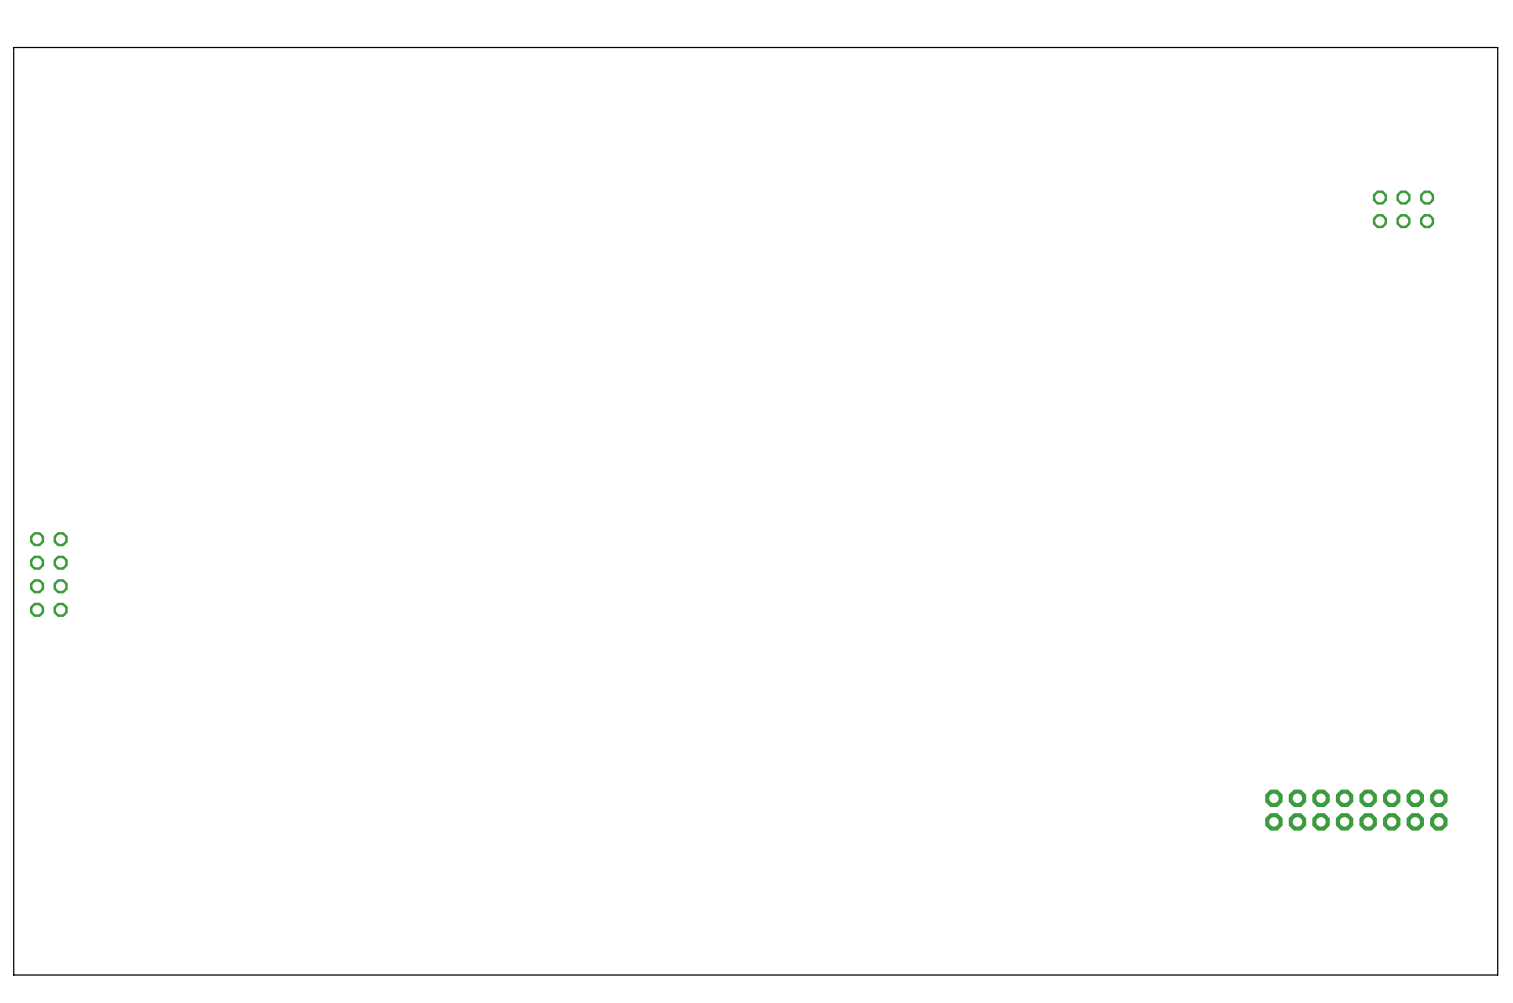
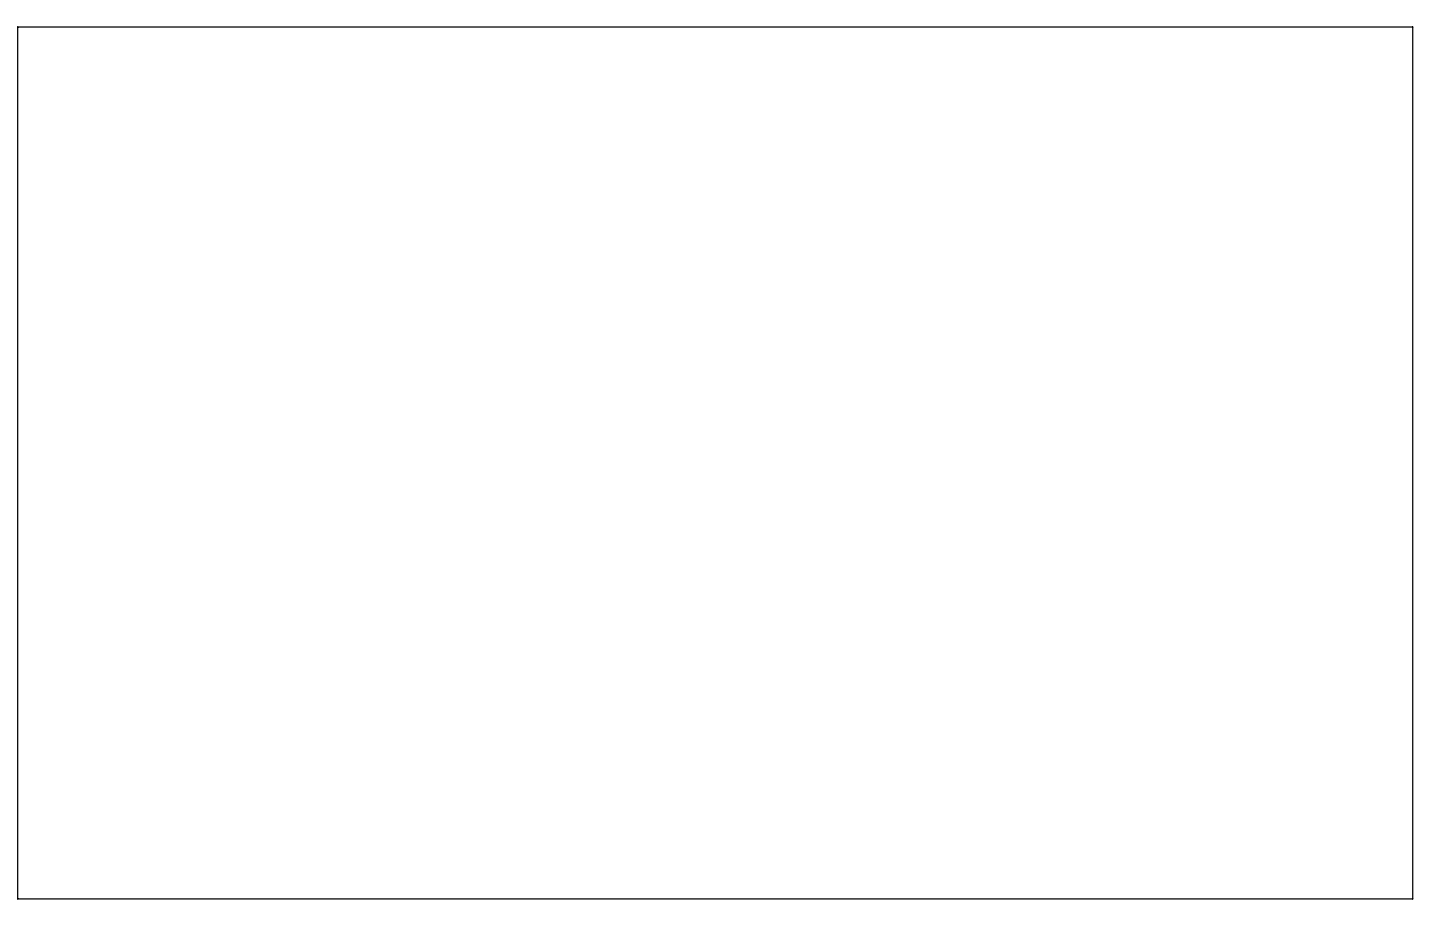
part: (1403, 209) -> none
part: (48, 574) -> none
part: (1356, 810) -> none

